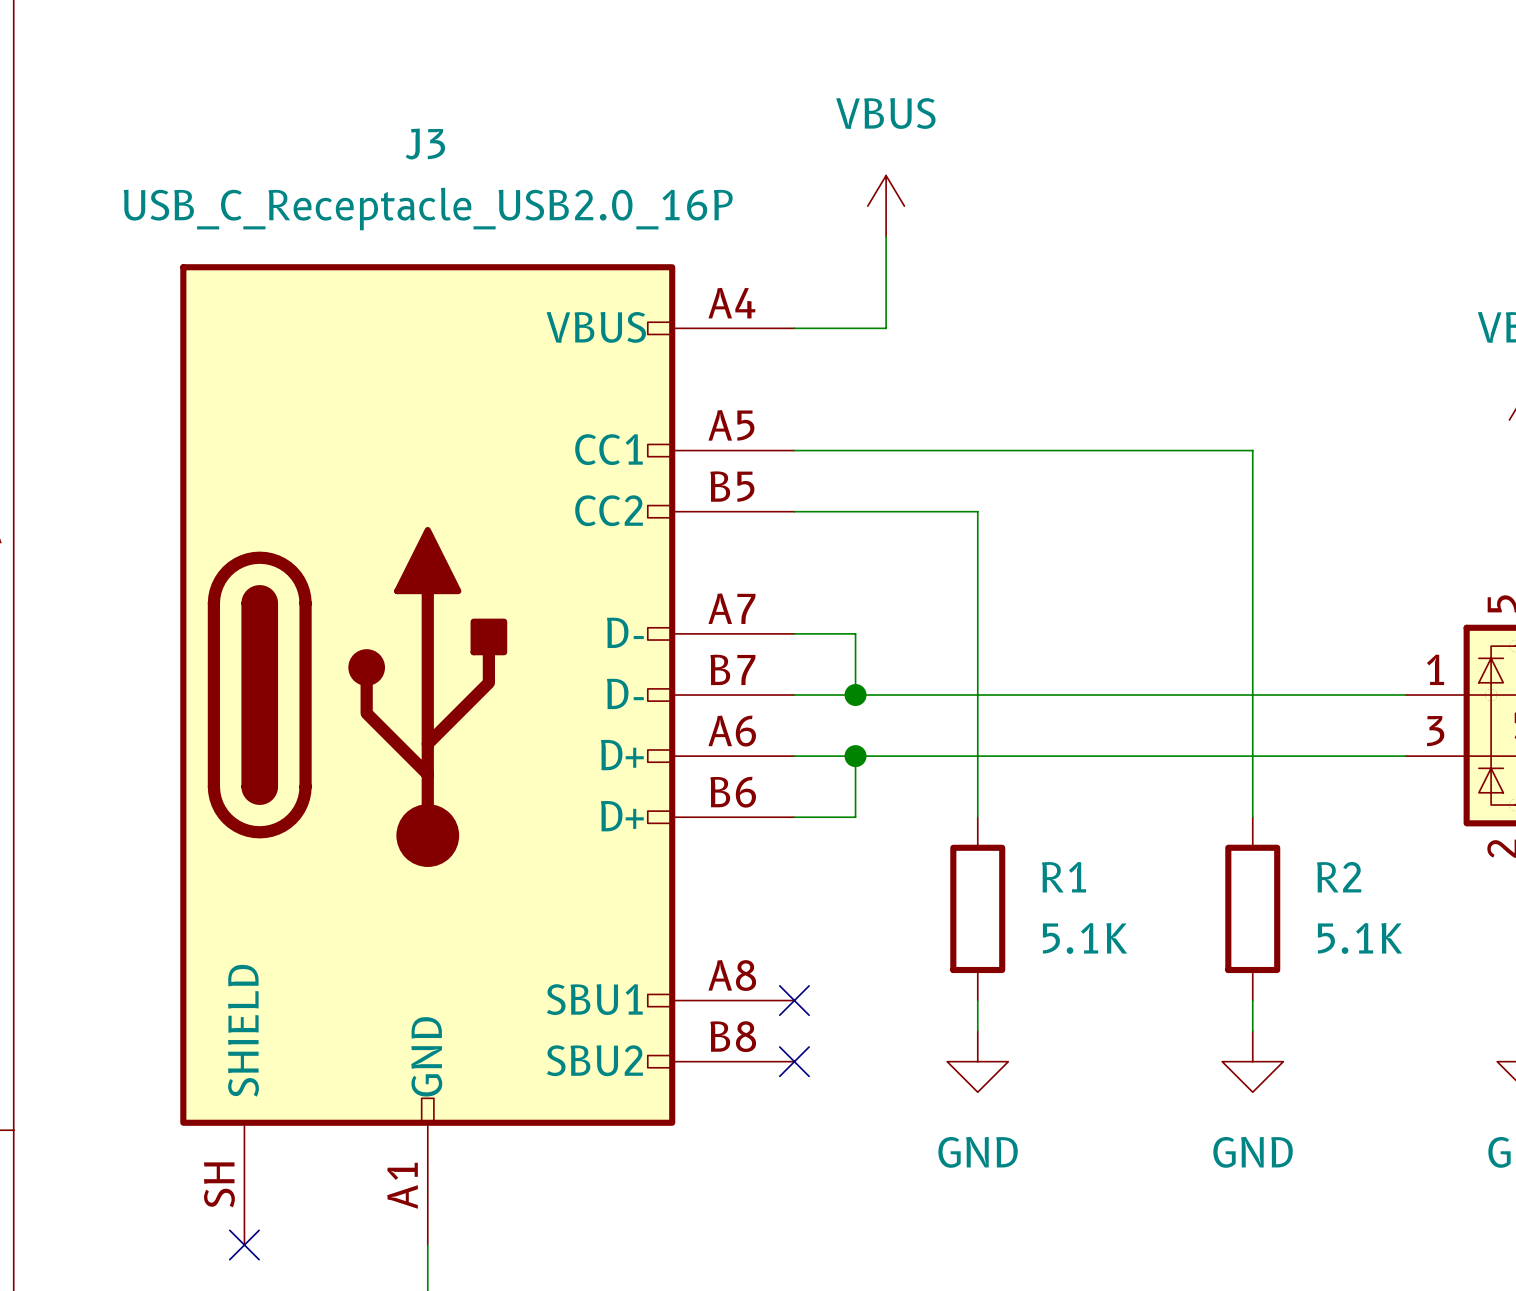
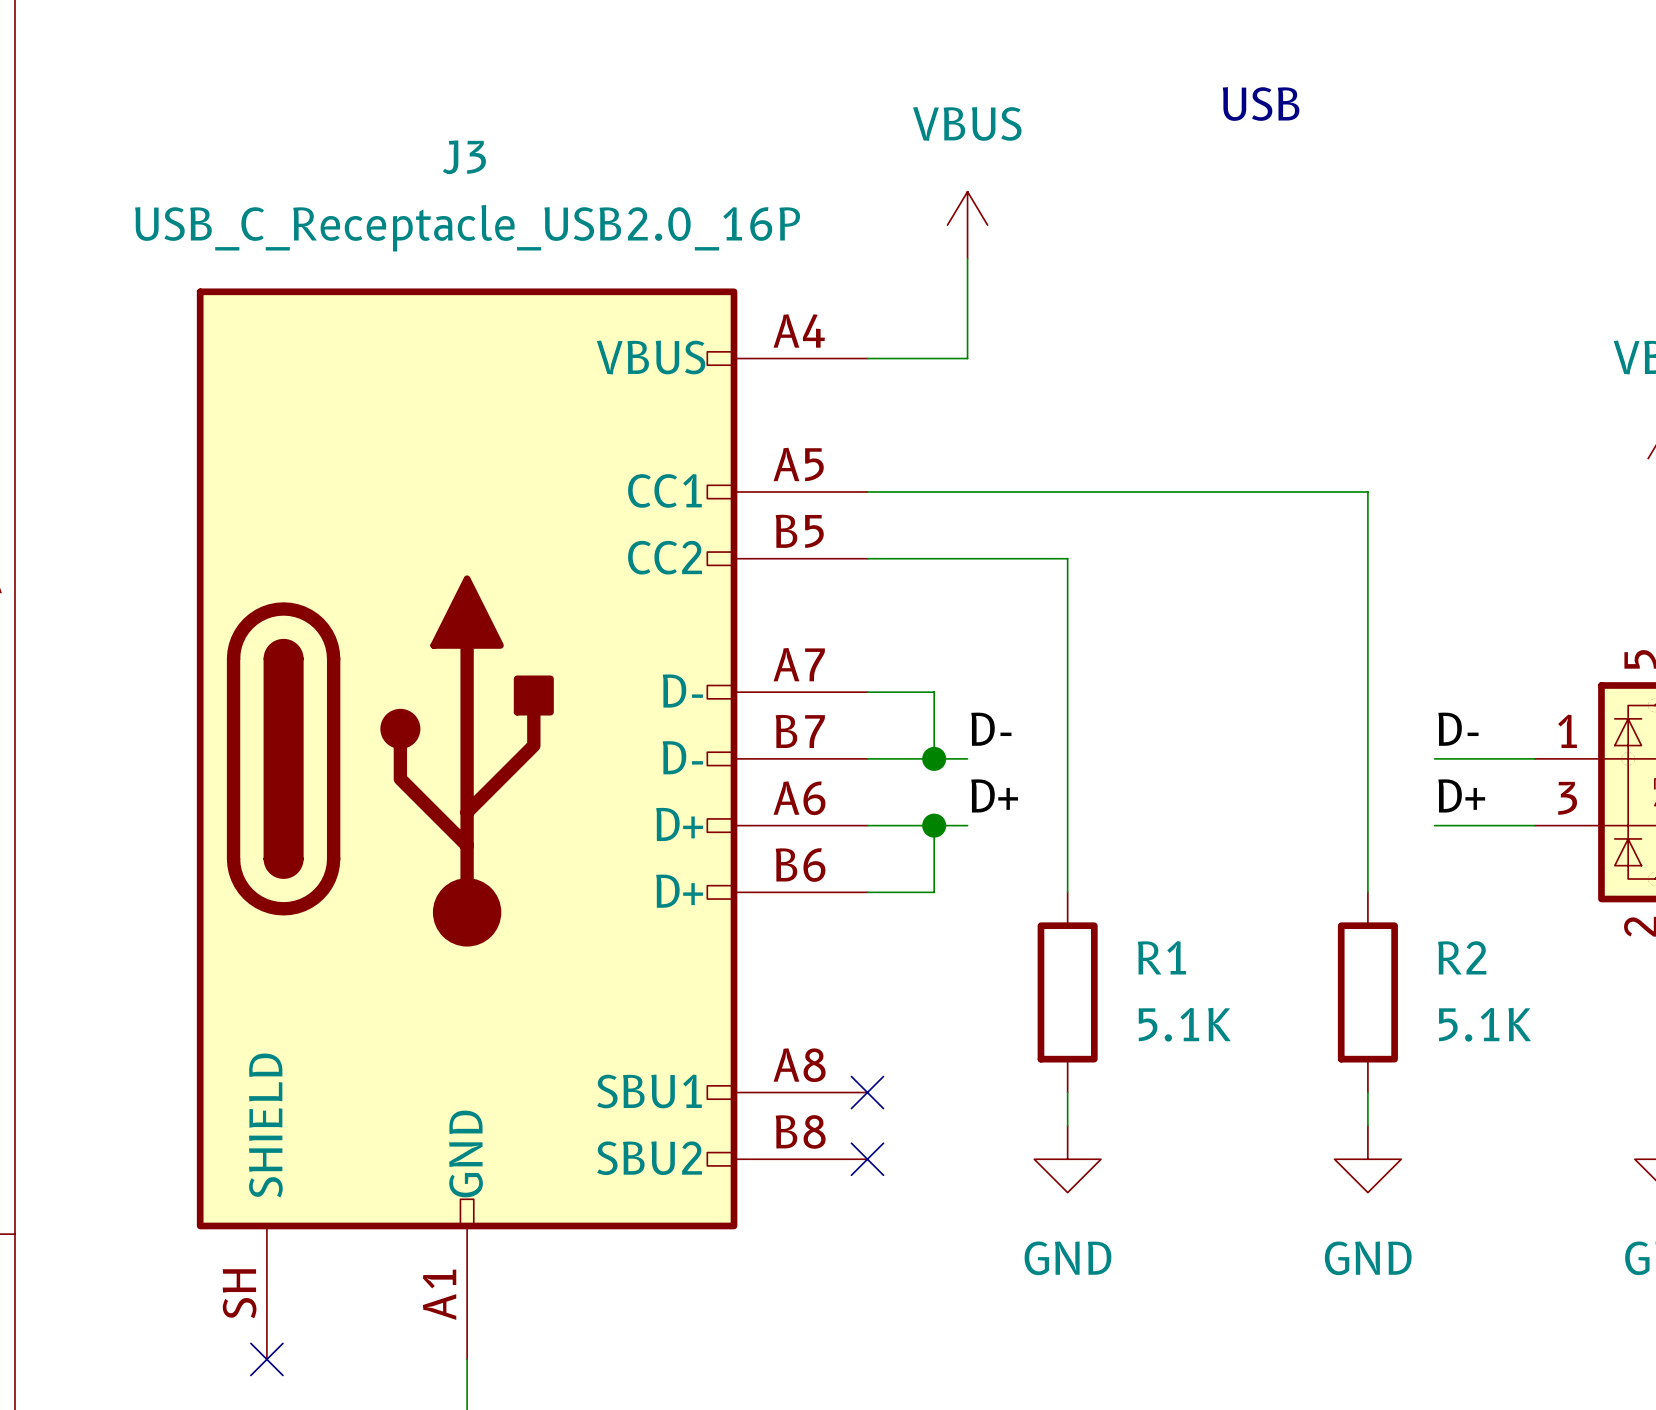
text: none -> USB (1261, 104)
label: none -> D- (991, 729)
label: none -> D- (1458, 729)
wire: (886, 695) (1313, 695) -> none
label: none -> D+ (994, 795)
label: none -> D+ (1461, 795)
wire: (886, 756) (1313, 756) -> none

